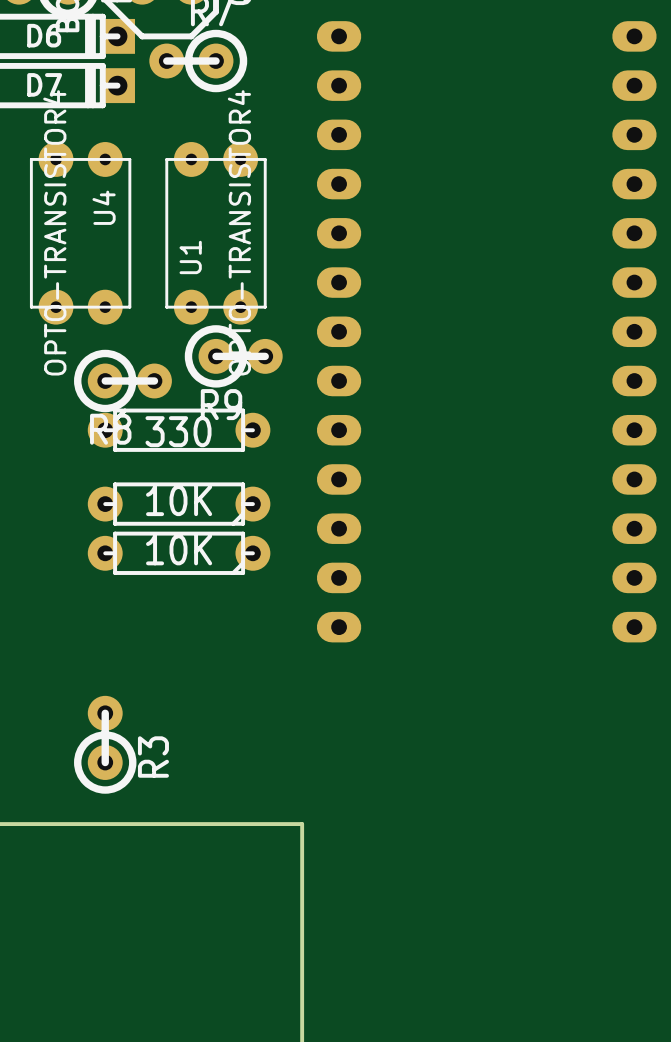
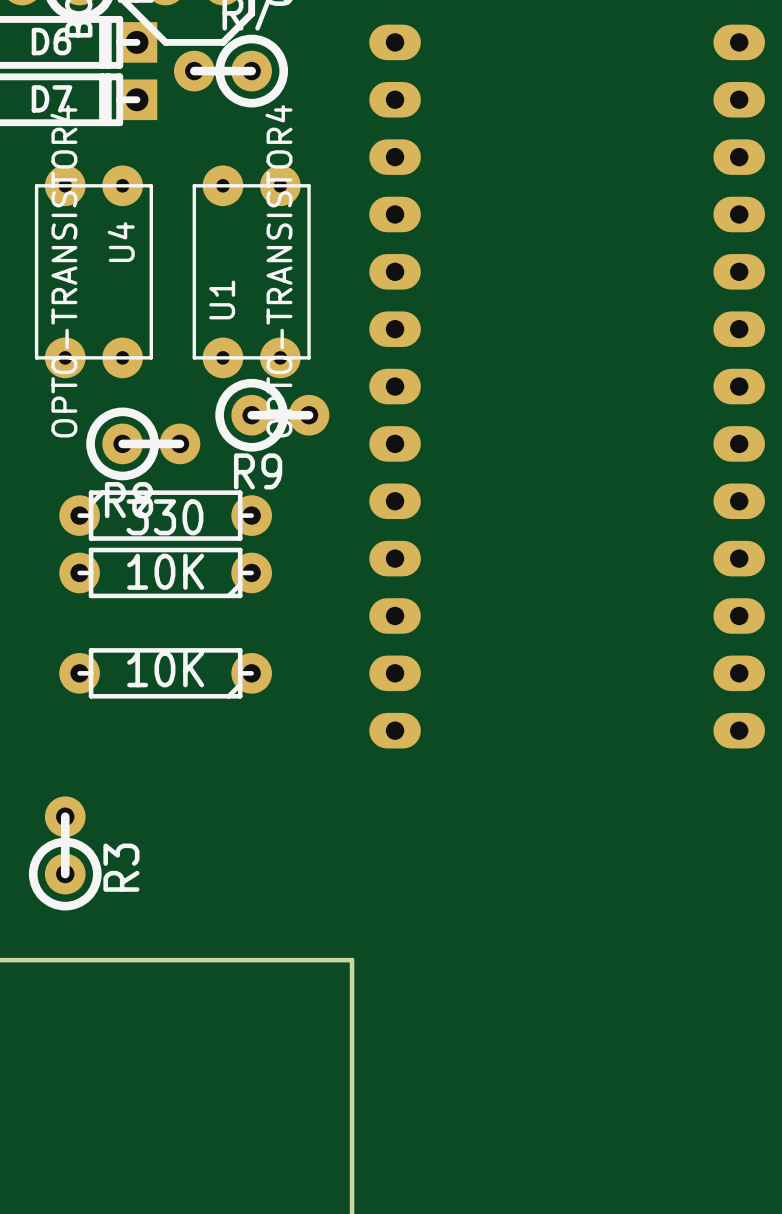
part position: (179, 430) -> (165, 515)
part: none -> 10K (165, 572)
part: 10K (179, 504) -> none
part: 10K (179, 553) -> none
part: none -> 10K (165, 673)
R3 position: (105, 744) -> (65, 853)

